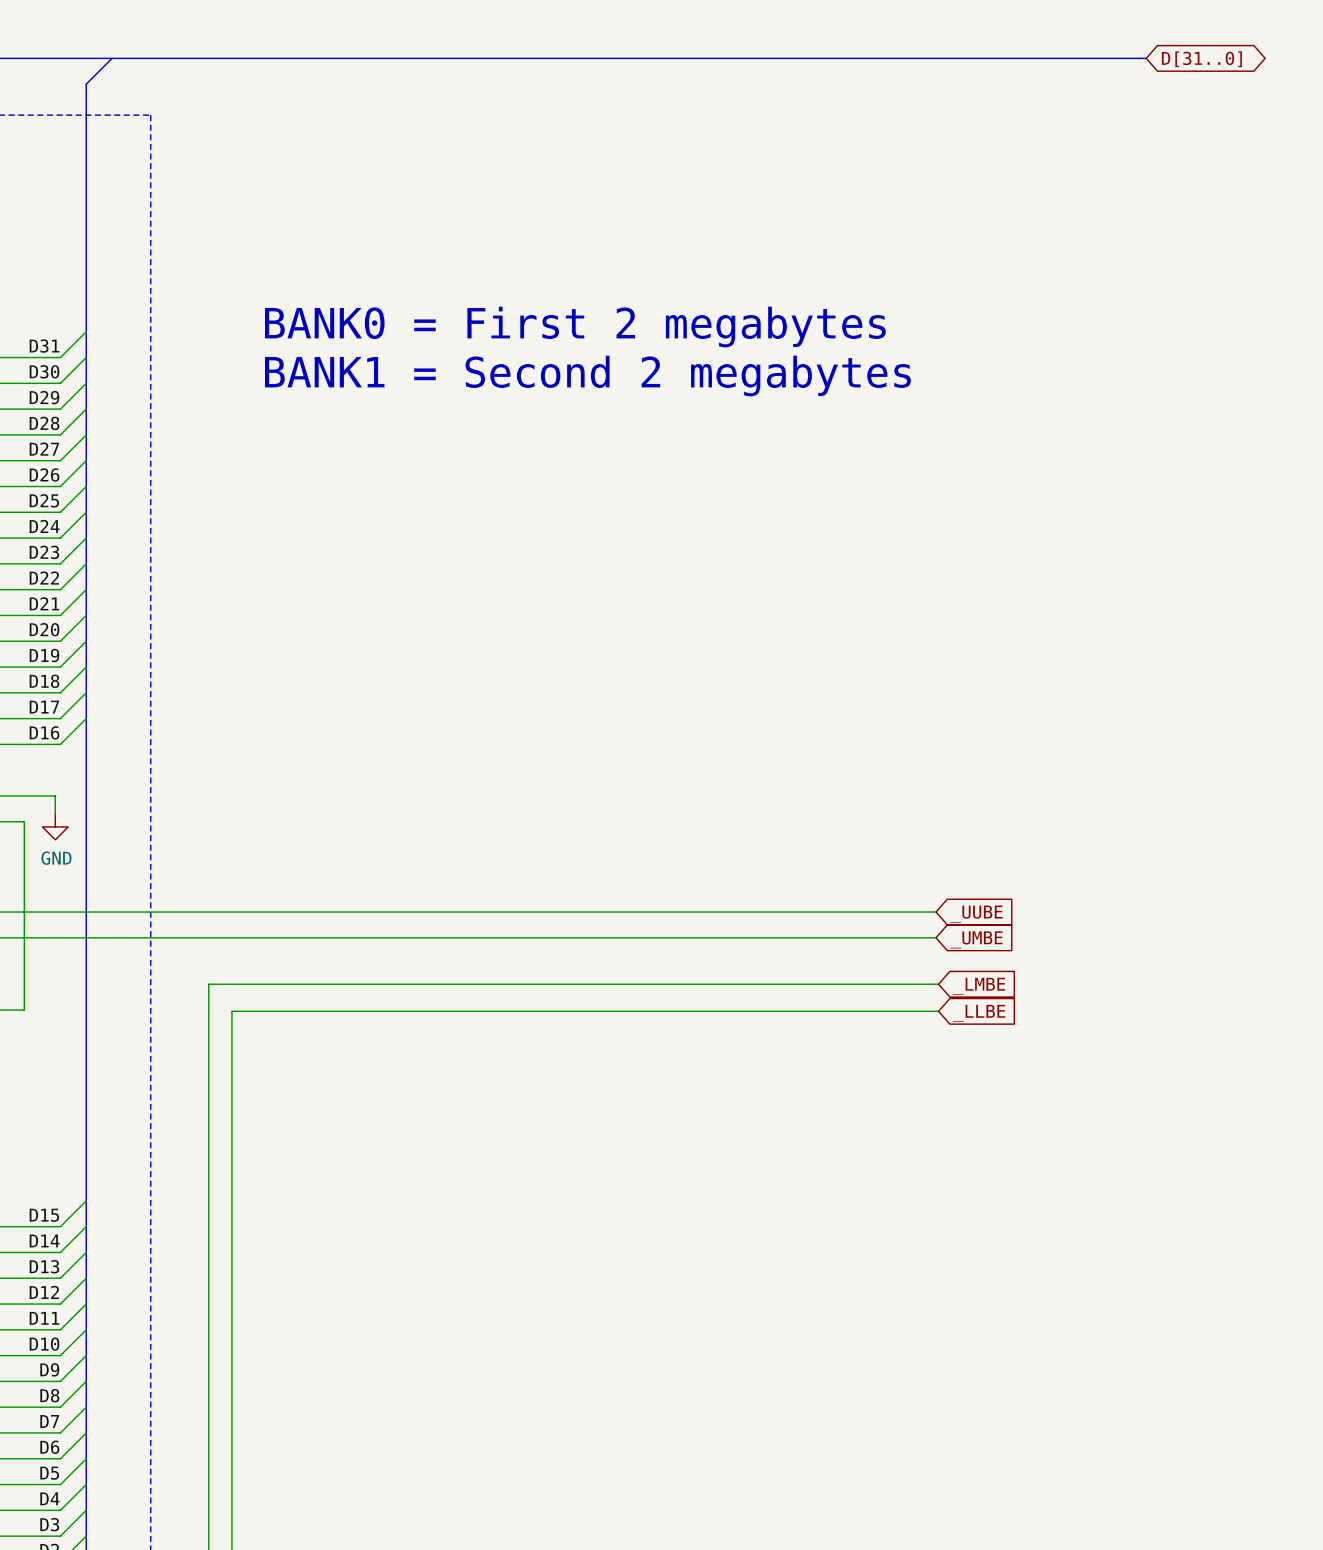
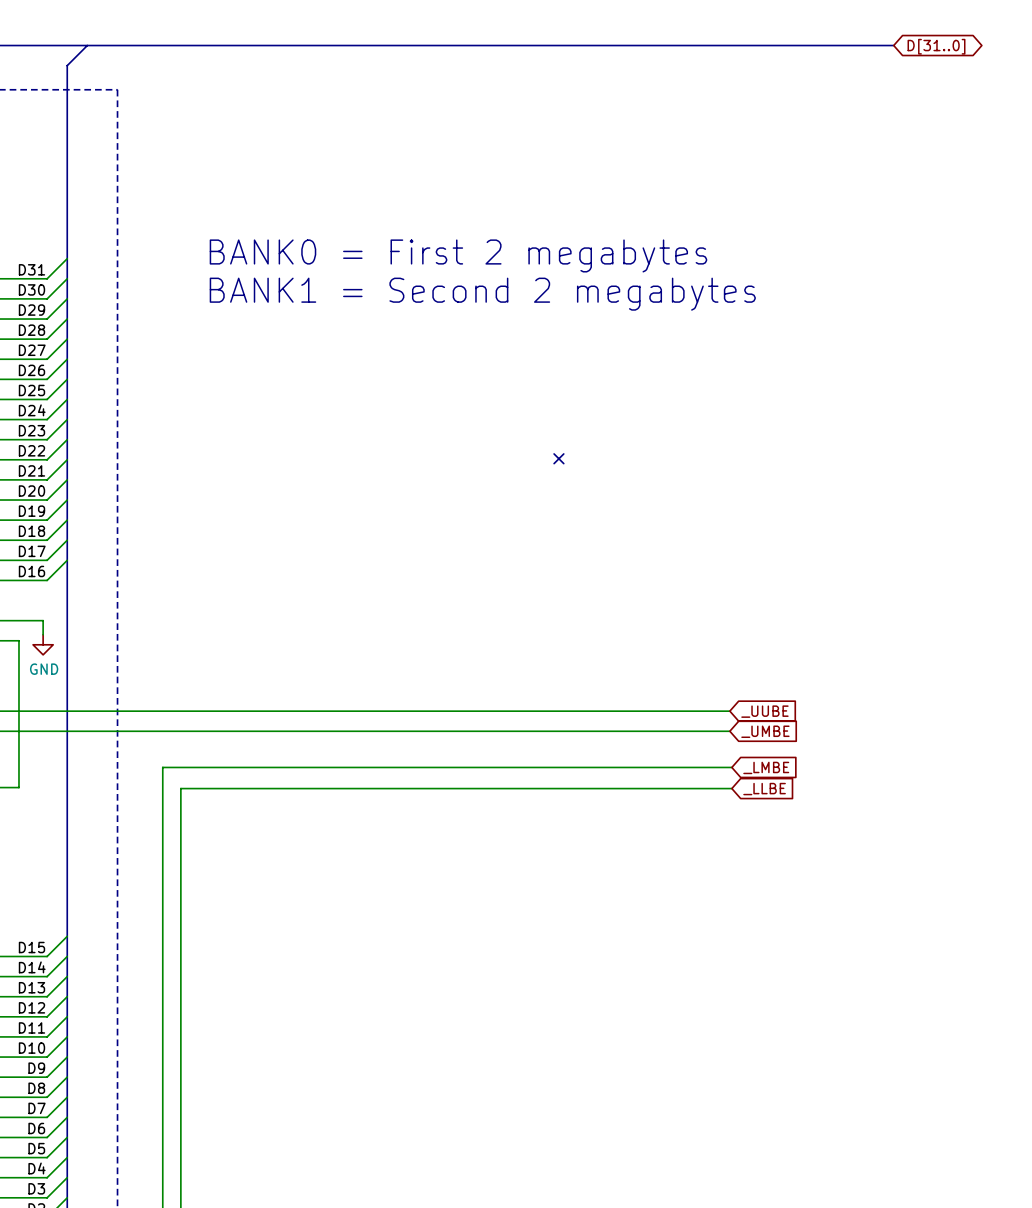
no-connect mark: none -> (558, 458)

